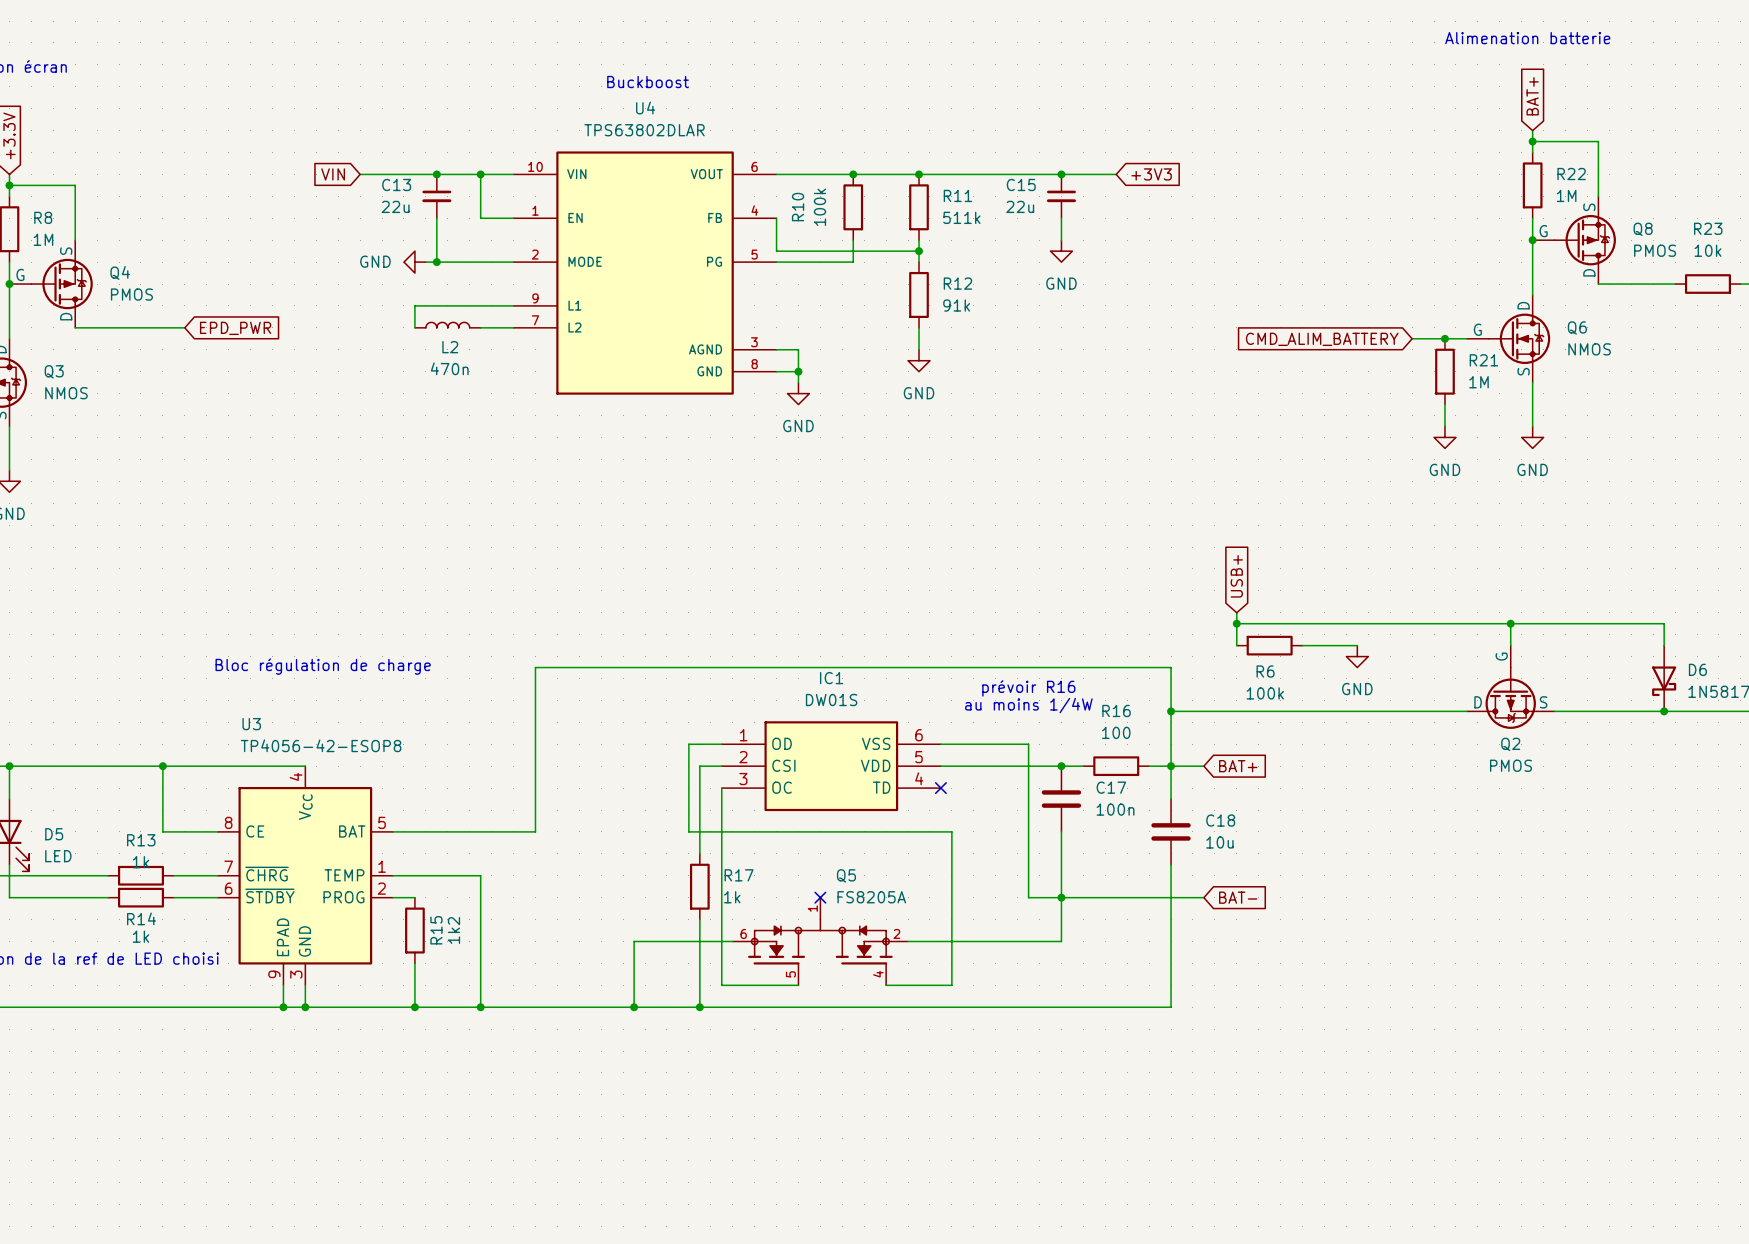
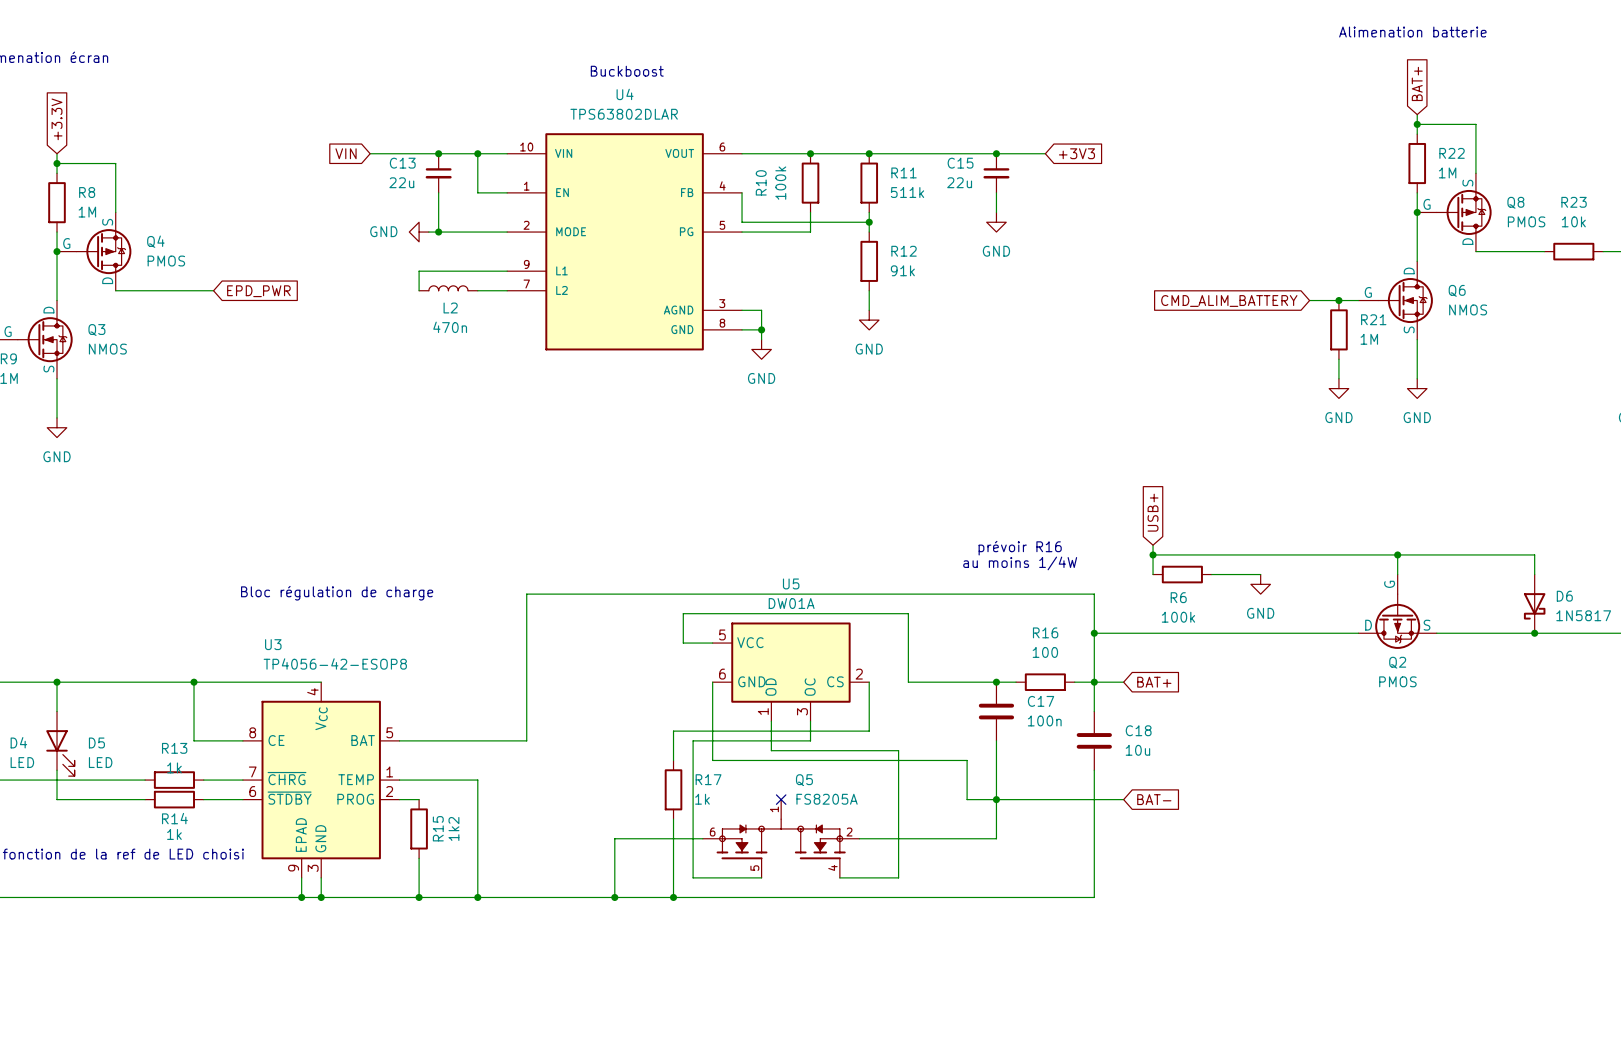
text position: prévoir R16 (1028, 688) -> prévoir R16 (1020, 548)
text position: au moins 1/4W (1028, 705) -> au moins 1/4W (1020, 563)
wire: (721, 744) (688, 744) (688, 831) (721, 831) (721, 788) -> none
wire: (940, 744) (1028, 744) (1028, 853) -> (712, 682) (712, 760) (967, 760)
U5: none -> DW01A (790, 671)
wire: (721, 766) (699, 766) (699, 820) -> (869, 682) (869, 731) (673, 731)
IC1: DW01S (831, 766) -> none
wire: (940, 766) (962, 766) -> (712, 643) (683, 643) (683, 613) (908, 613) (908, 682)
no-connect mark: (940, 788) -> none
wire: none -> (810, 721) (810, 740)
wire: (853, 831) (951, 831) (951, 842) -> (771, 721) (771, 750) (898, 750)

